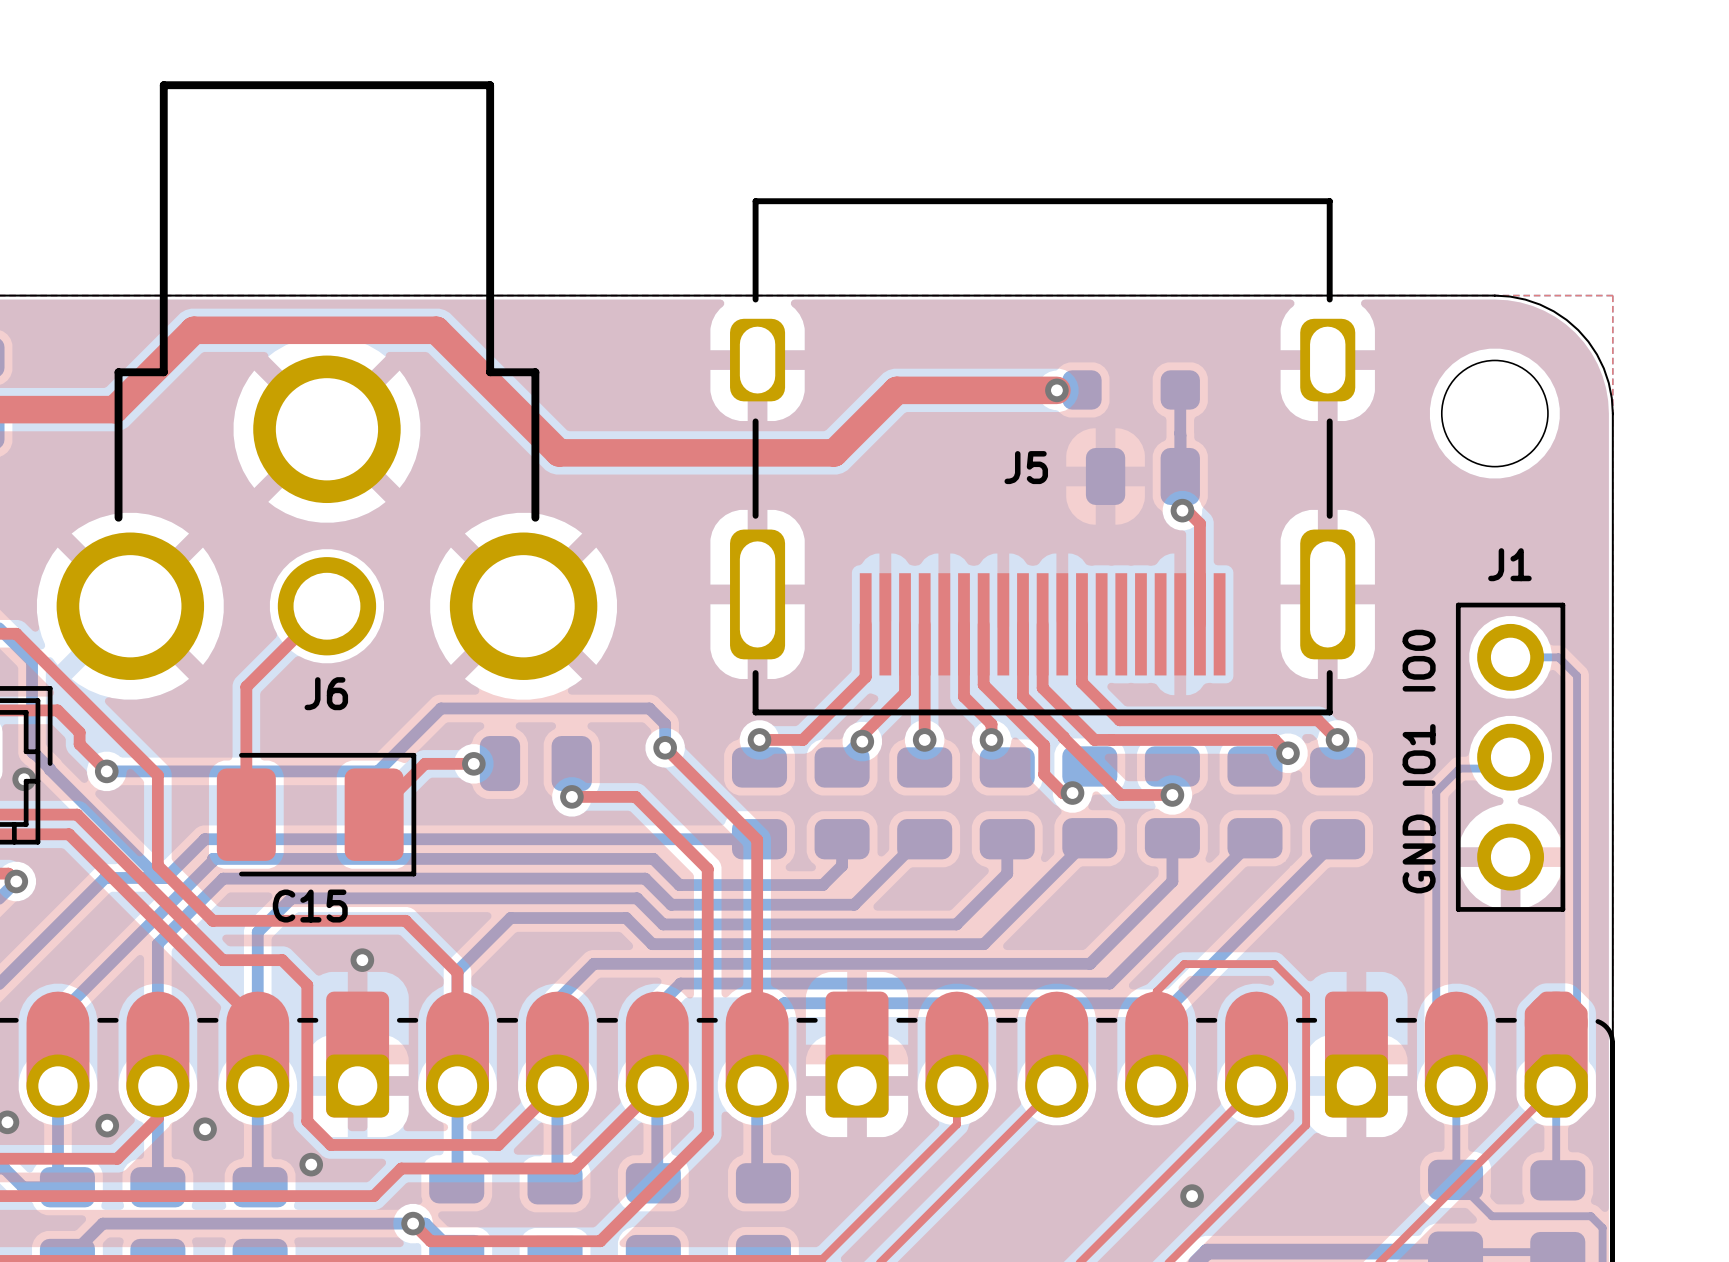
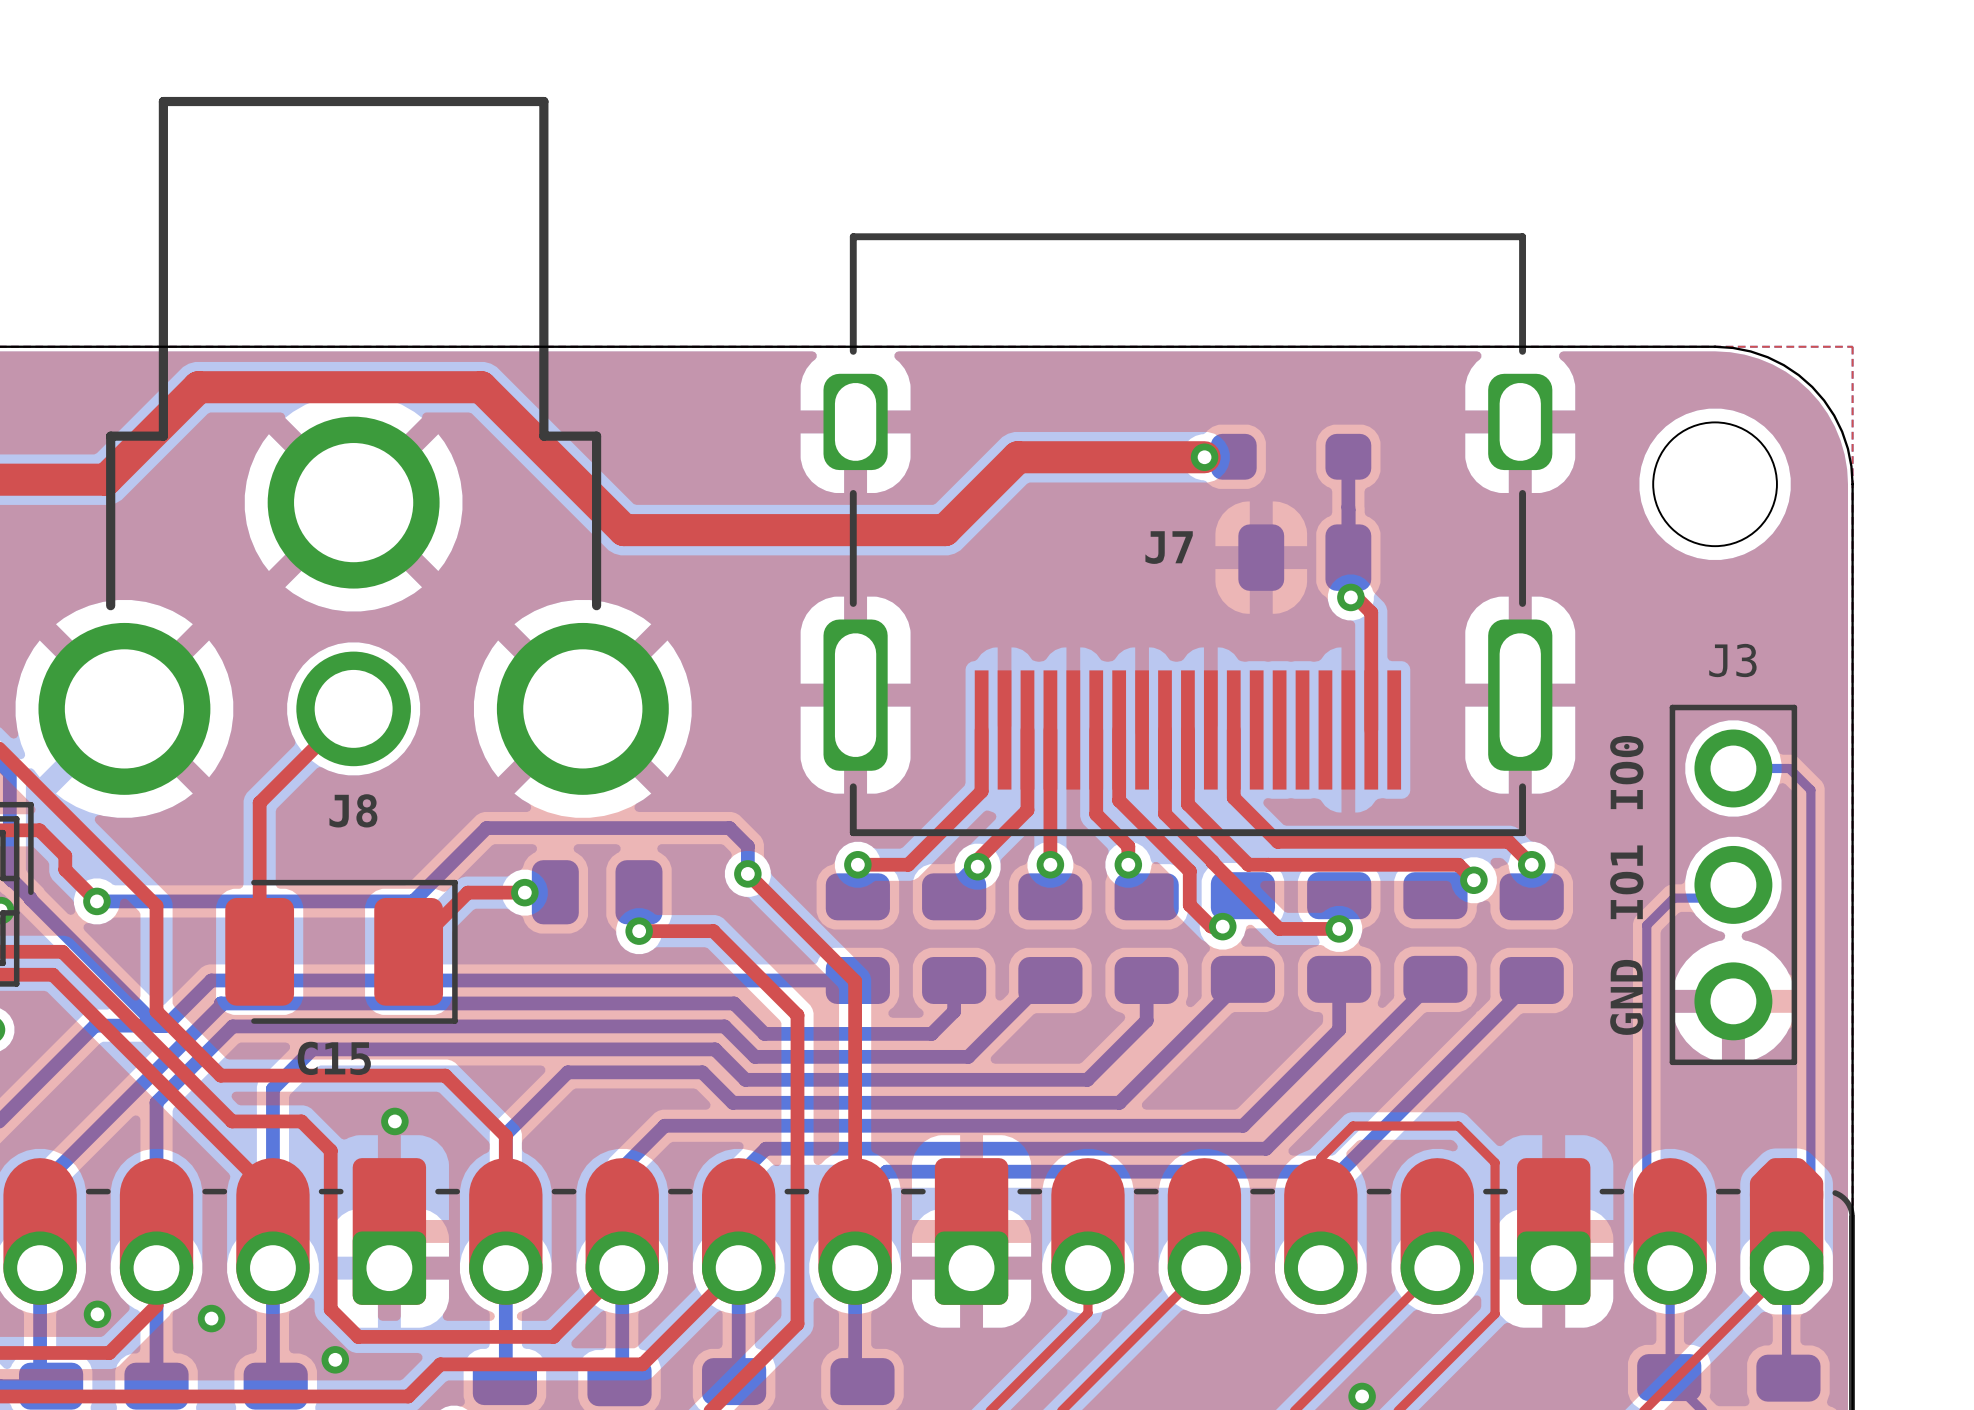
J5 name: J5 (1026, 467) -> J7 (1169, 547)
J1 name: J1 (1509, 564) -> J3 (1732, 660)
J6 name: J6 (326, 693) -> J8 (353, 810)

